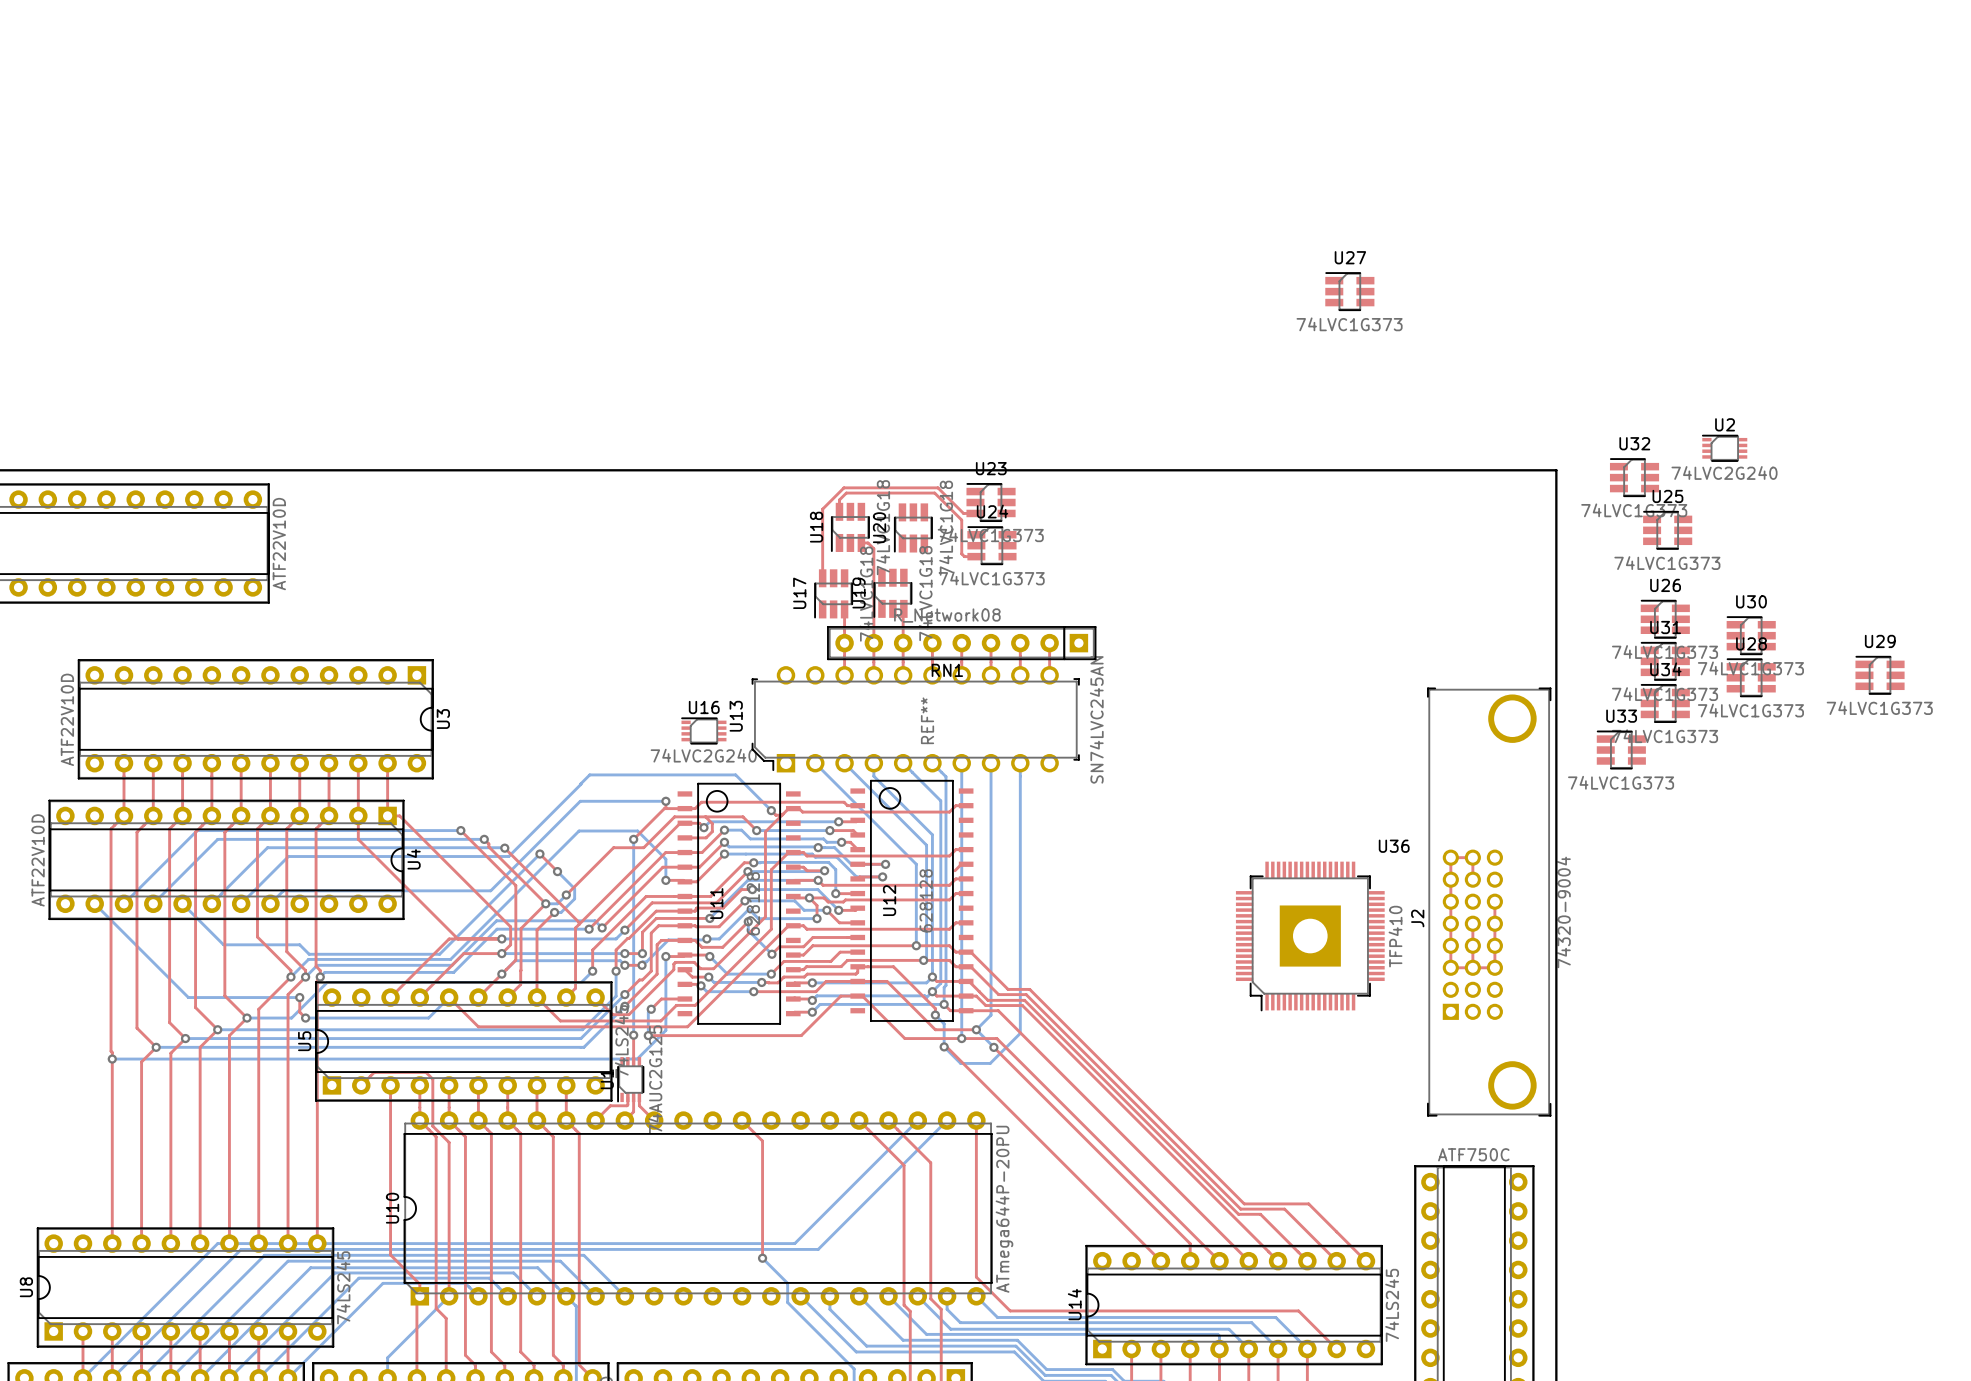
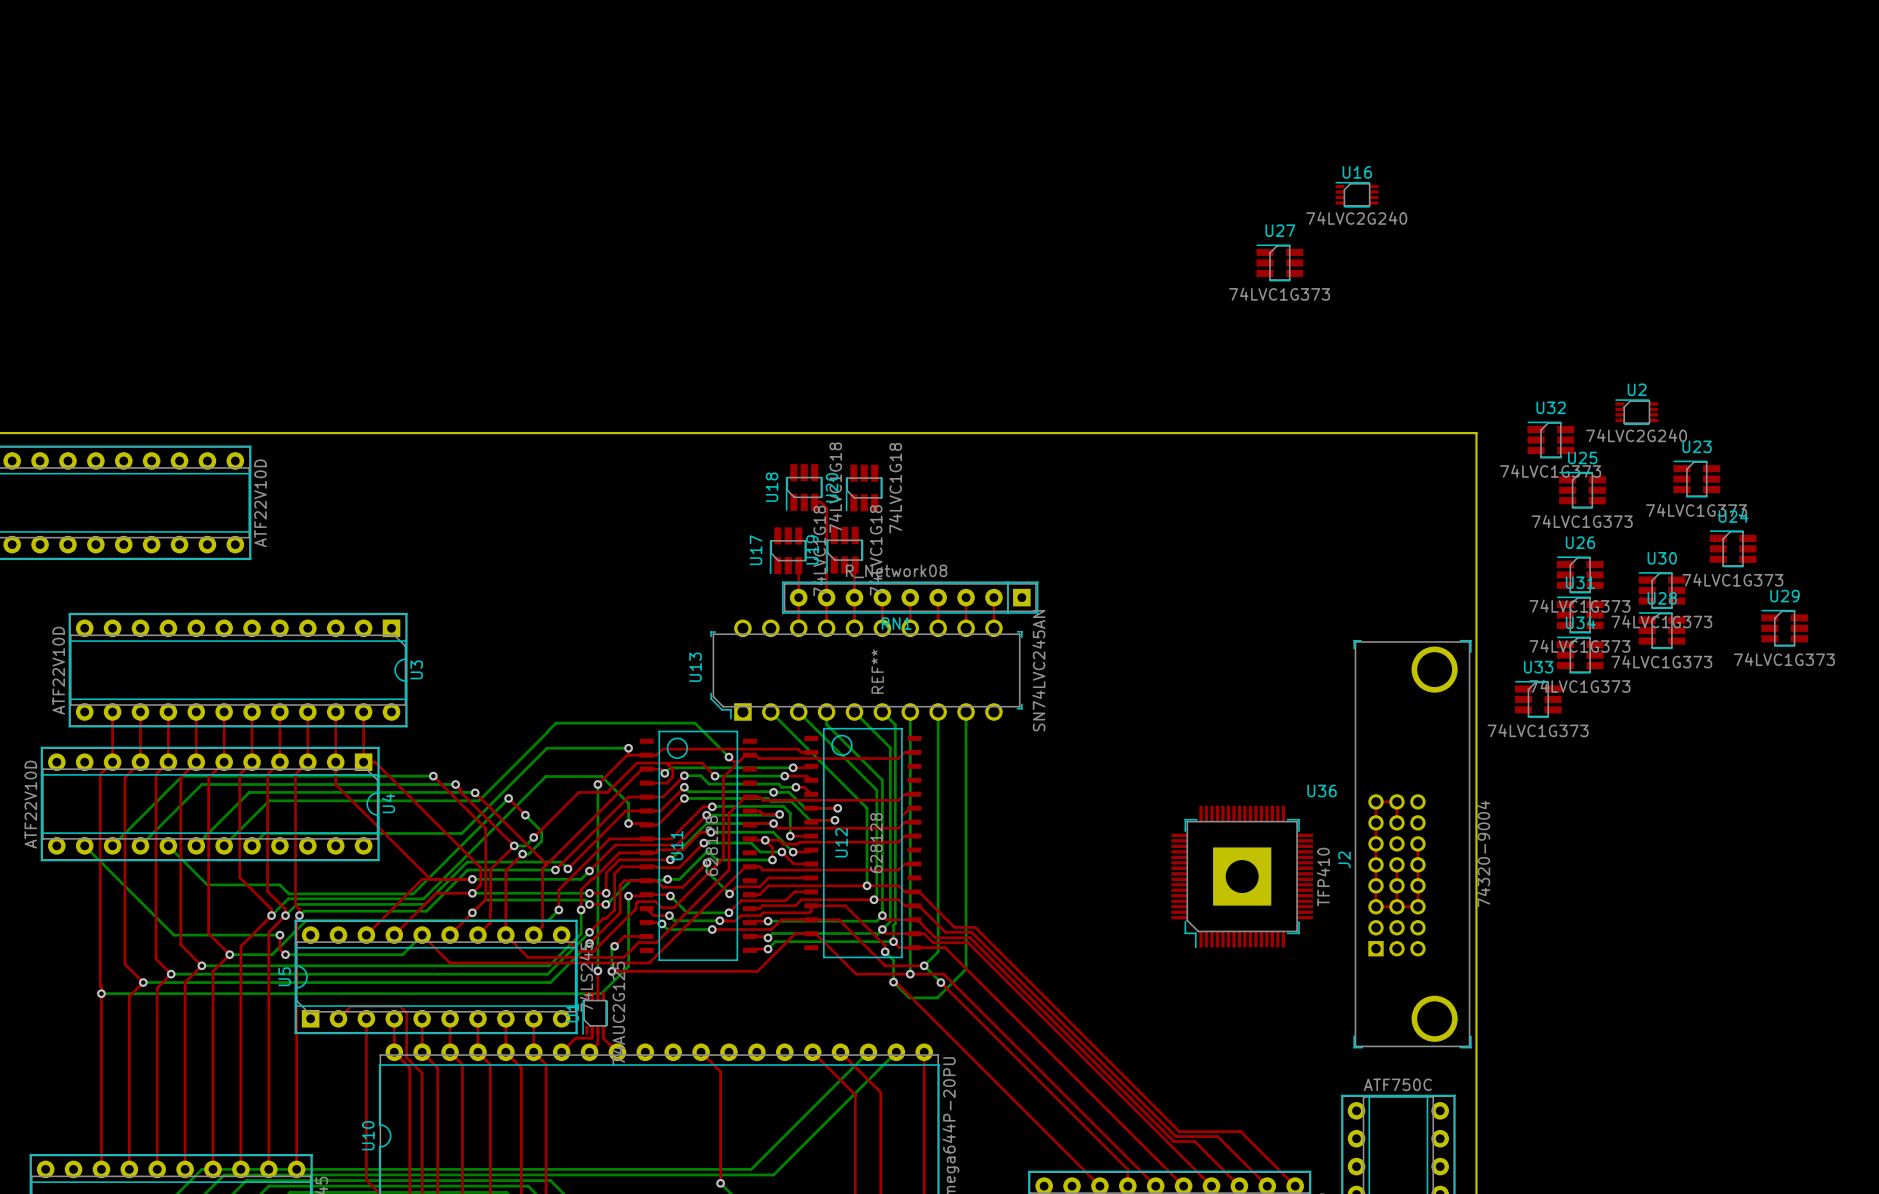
U23 position: (991, 502) -> (1696, 479)
top track: (839, 511) (839, 499) (846, 493) (934, 493) (961, 520) (961, 553) (964, 556) (976, 556) -> none
top track: (975, 513) (963, 513) (937, 487) (843, 487) (822, 509) (822, 578) -> none
U24 position: (991, 545) -> (1733, 548)
U16 position: (703, 730) -> (1356, 194)

